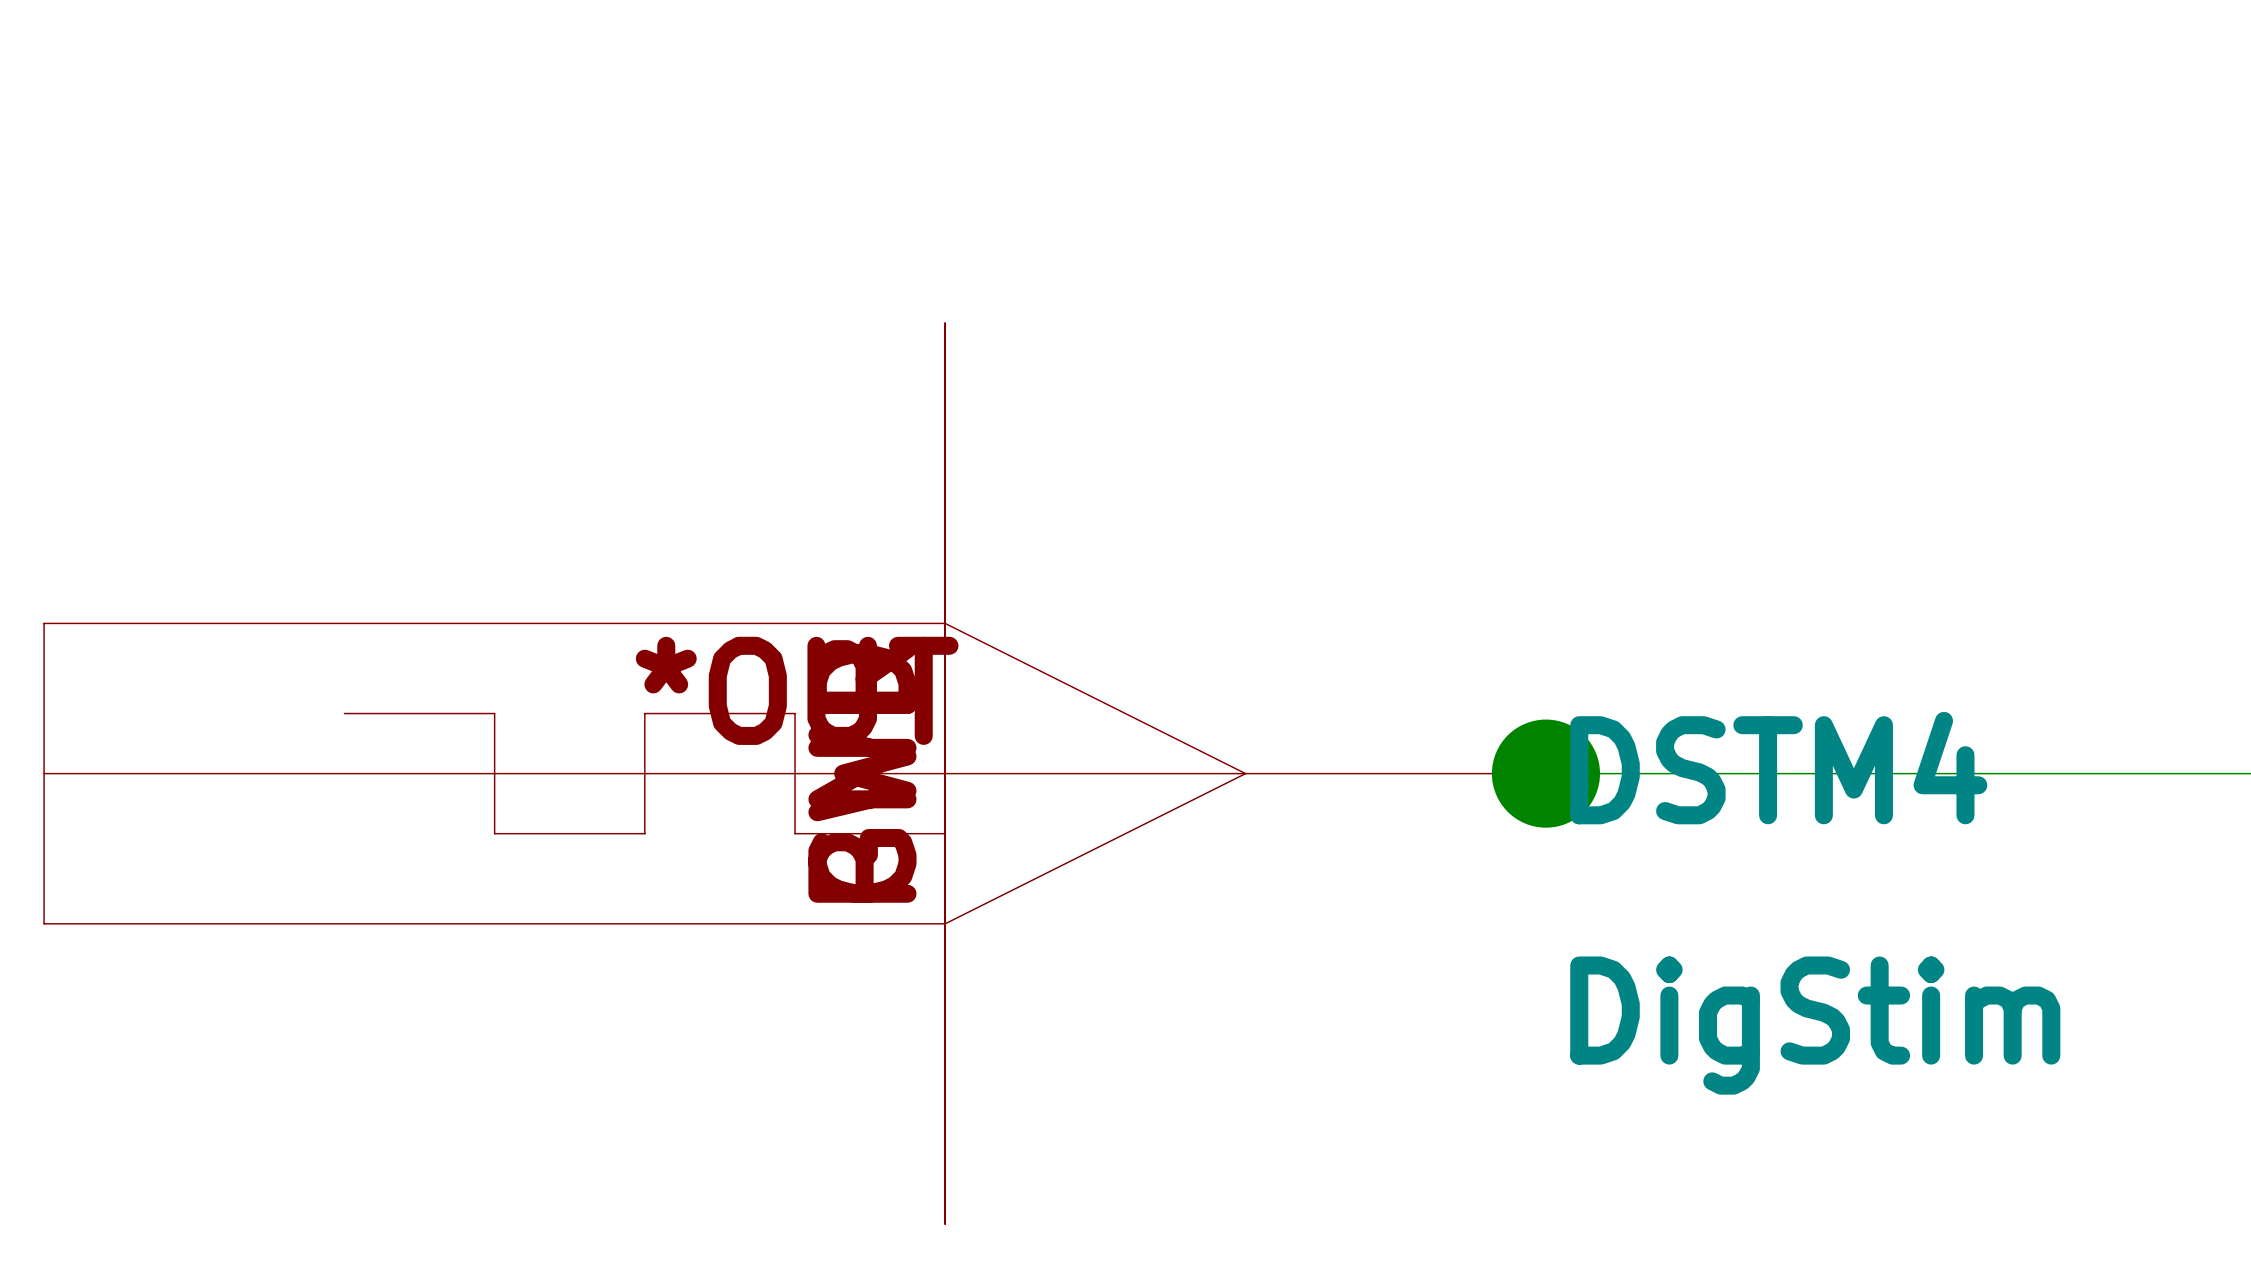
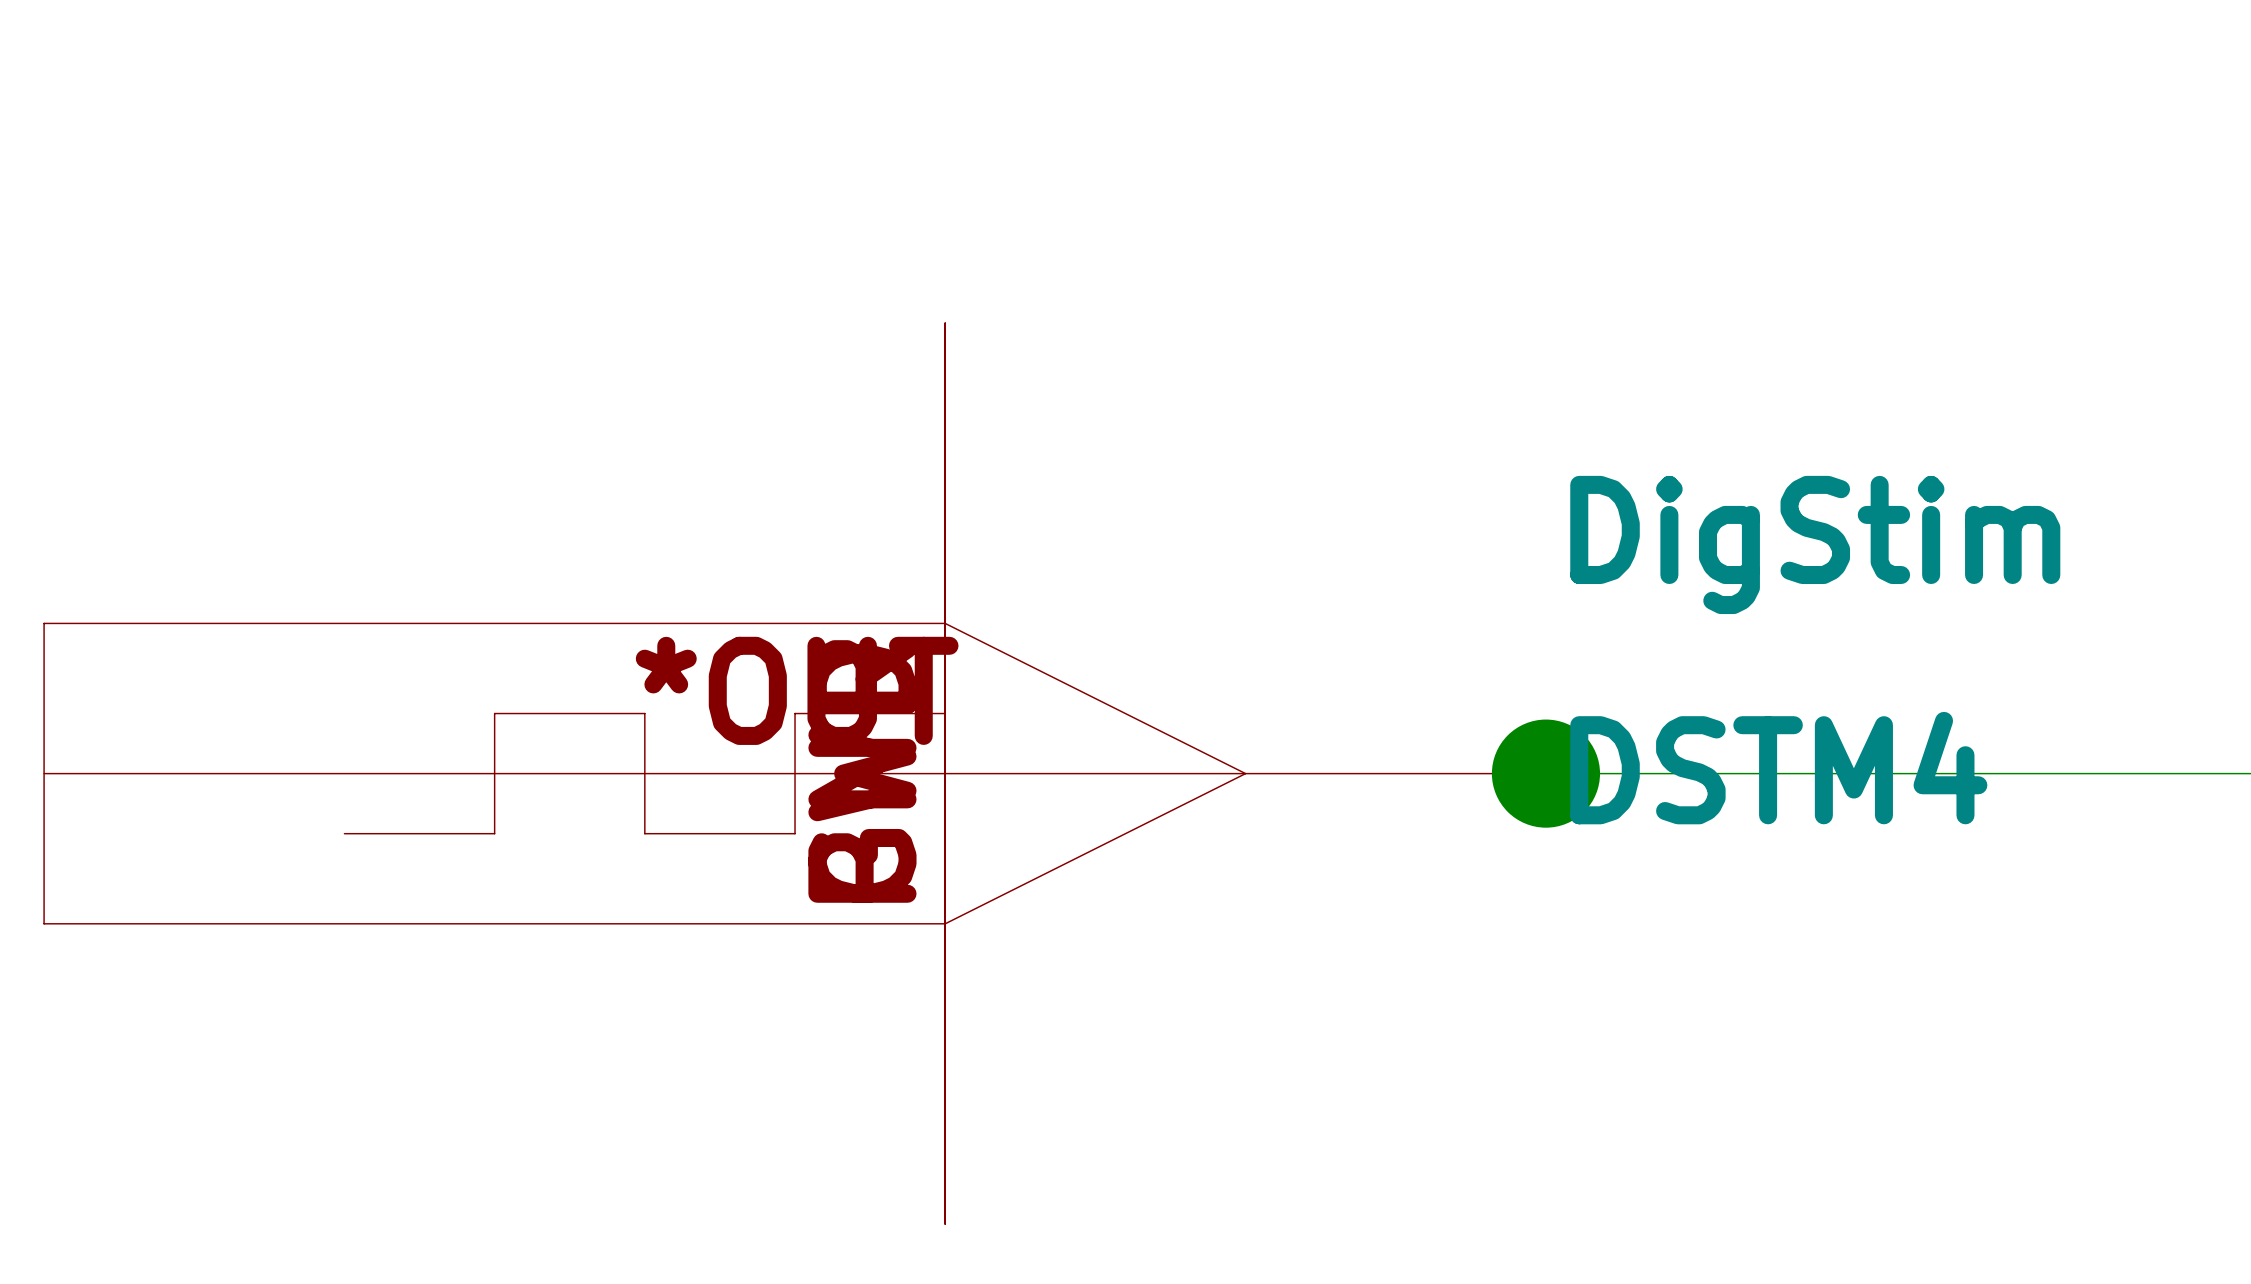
DSTM4 flip: as is (644, 773) -> up-down (644, 773)

